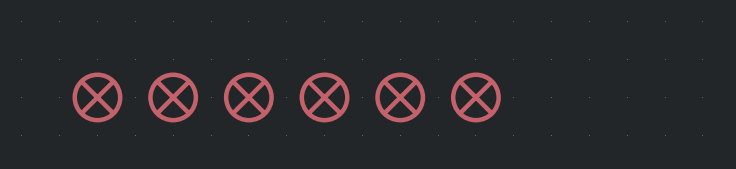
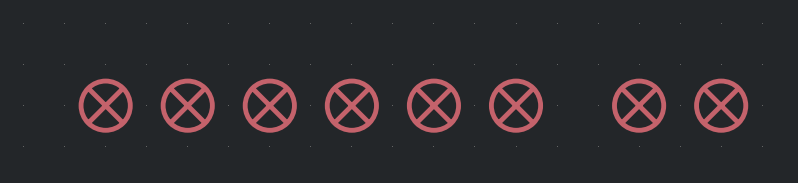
part: none -> (639, 105)
part: none -> (721, 105)

